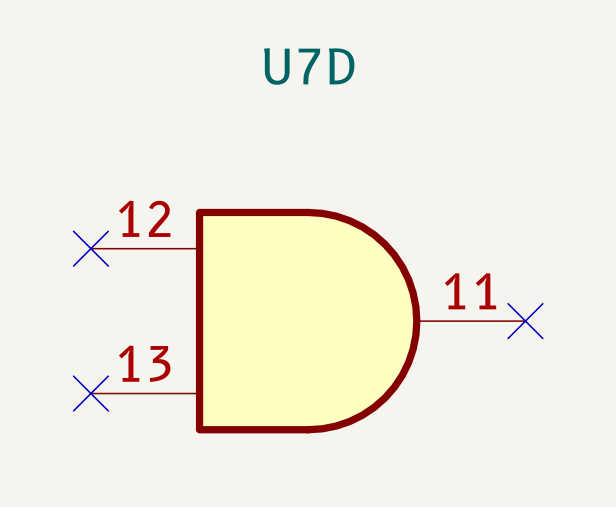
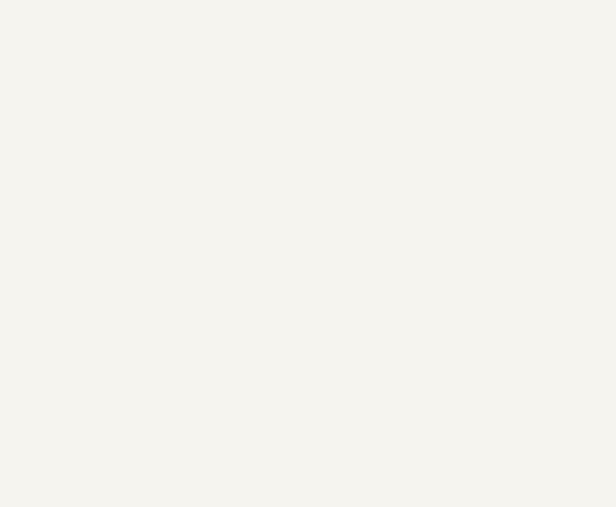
no-connect mark: (90, 248) -> none
U7D: (308, 321) -> none
no-connect mark: (525, 321) -> none
no-connect mark: (90, 393) -> none

